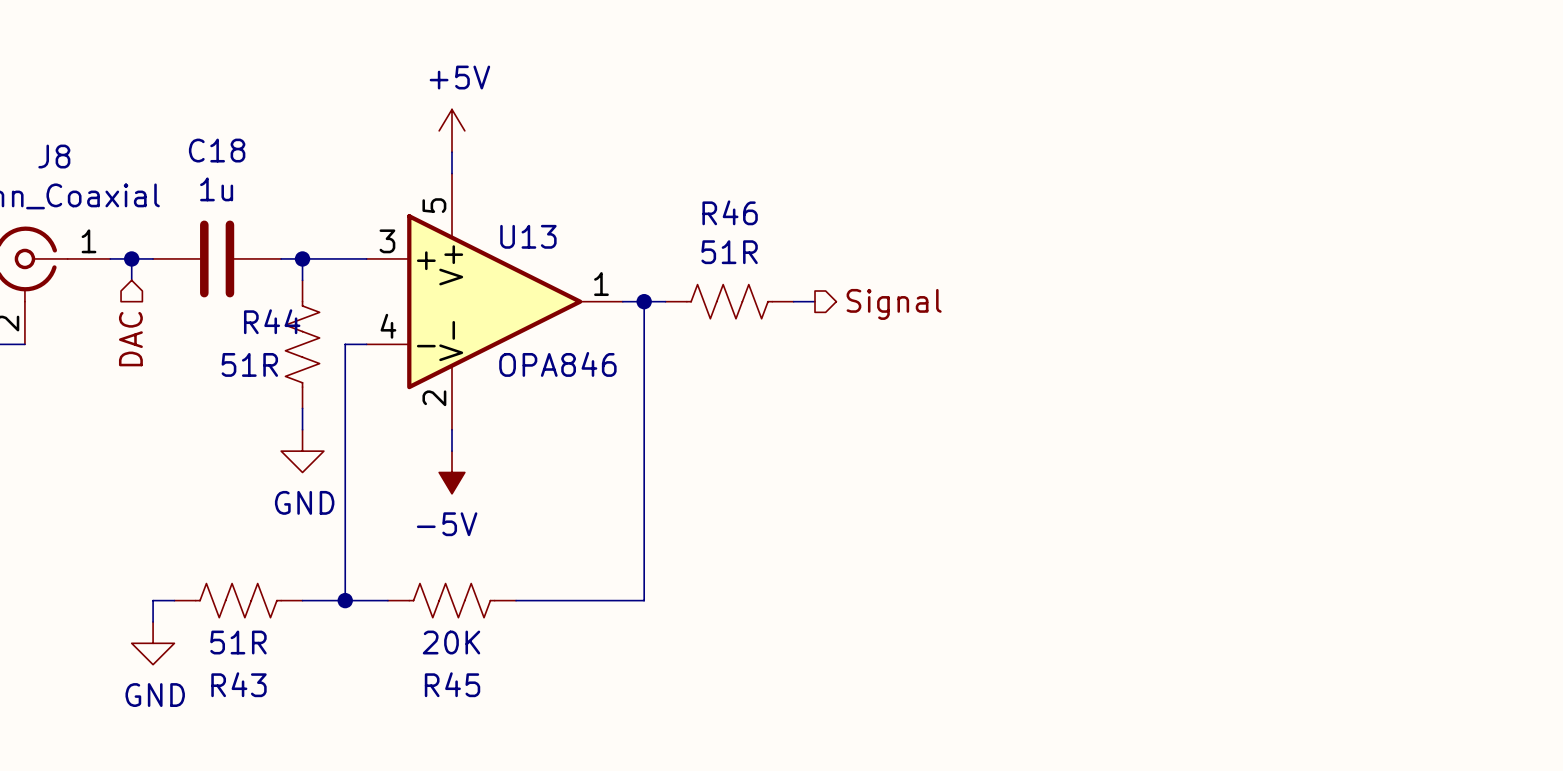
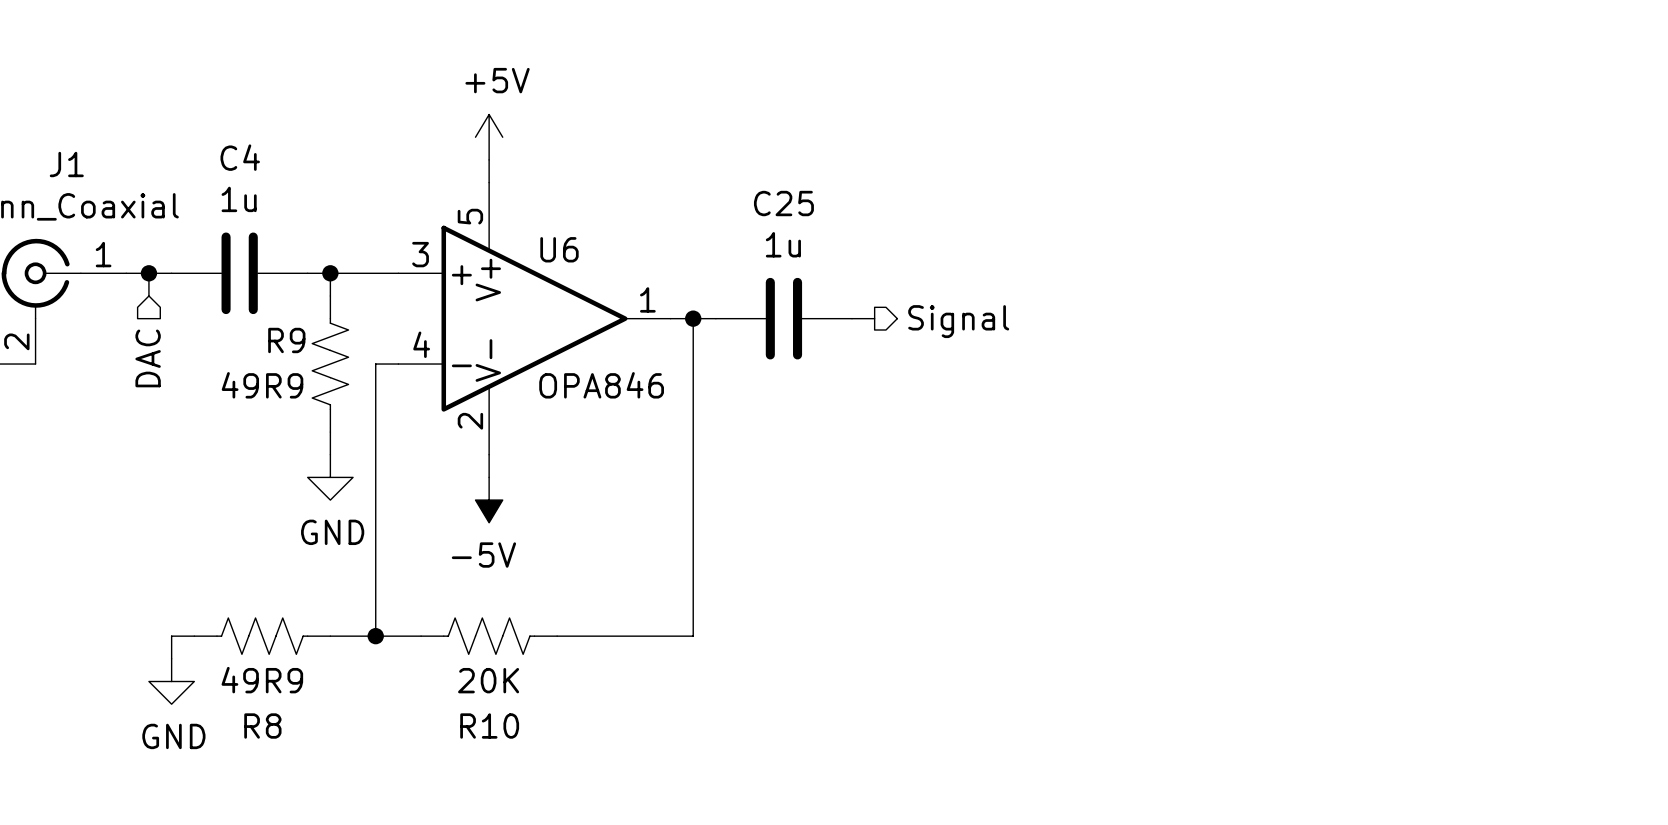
C18 name: C18 (217, 150) -> C4 (240, 157)
J8 name: J8 (54, 156) -> J1 (66, 164)
U13 name: U13 (528, 236) -> U6 (559, 249)
R46: 51R (729, 301) -> none
C25: none -> 1u (783, 318)
R44 name: R44 (272, 321) -> R9 (286, 340)
R44 value: 51R (249, 364) -> 49R9 (262, 385)
R43 value: 51R (238, 642) -> 49R9 (262, 680)
R43 name: R43 (238, 684) -> R8 (262, 726)
R45 name: R45 (452, 684) -> R10 (489, 726)

